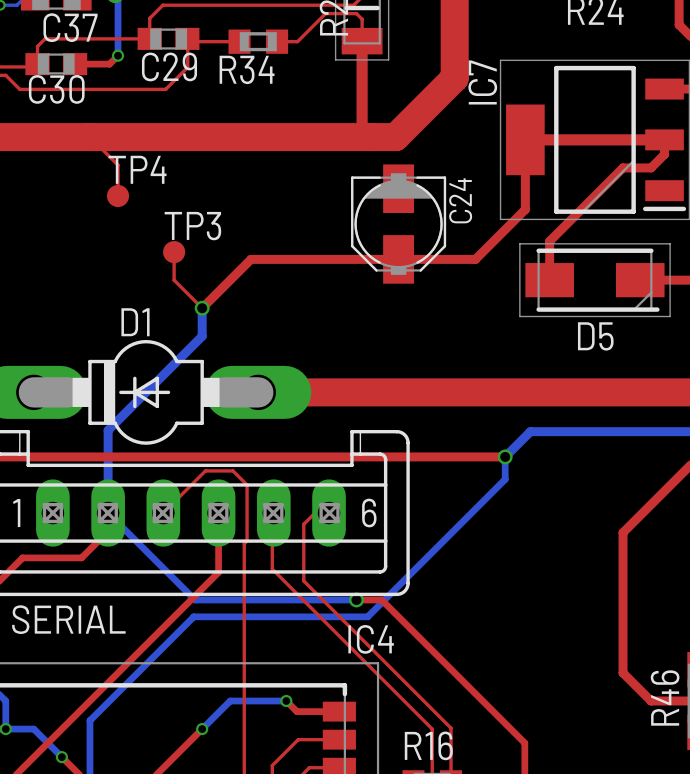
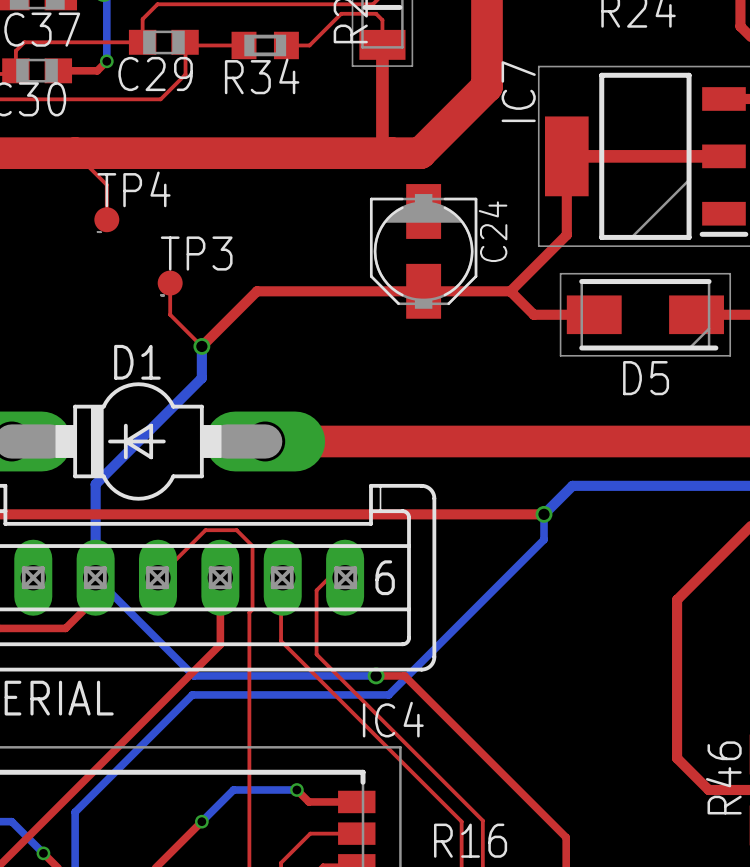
top track: (664, 139) (664, 154) (651, 167) (623, 167) (549, 241) (549, 280) -> (510, 291) (533, 314) (594, 314)

